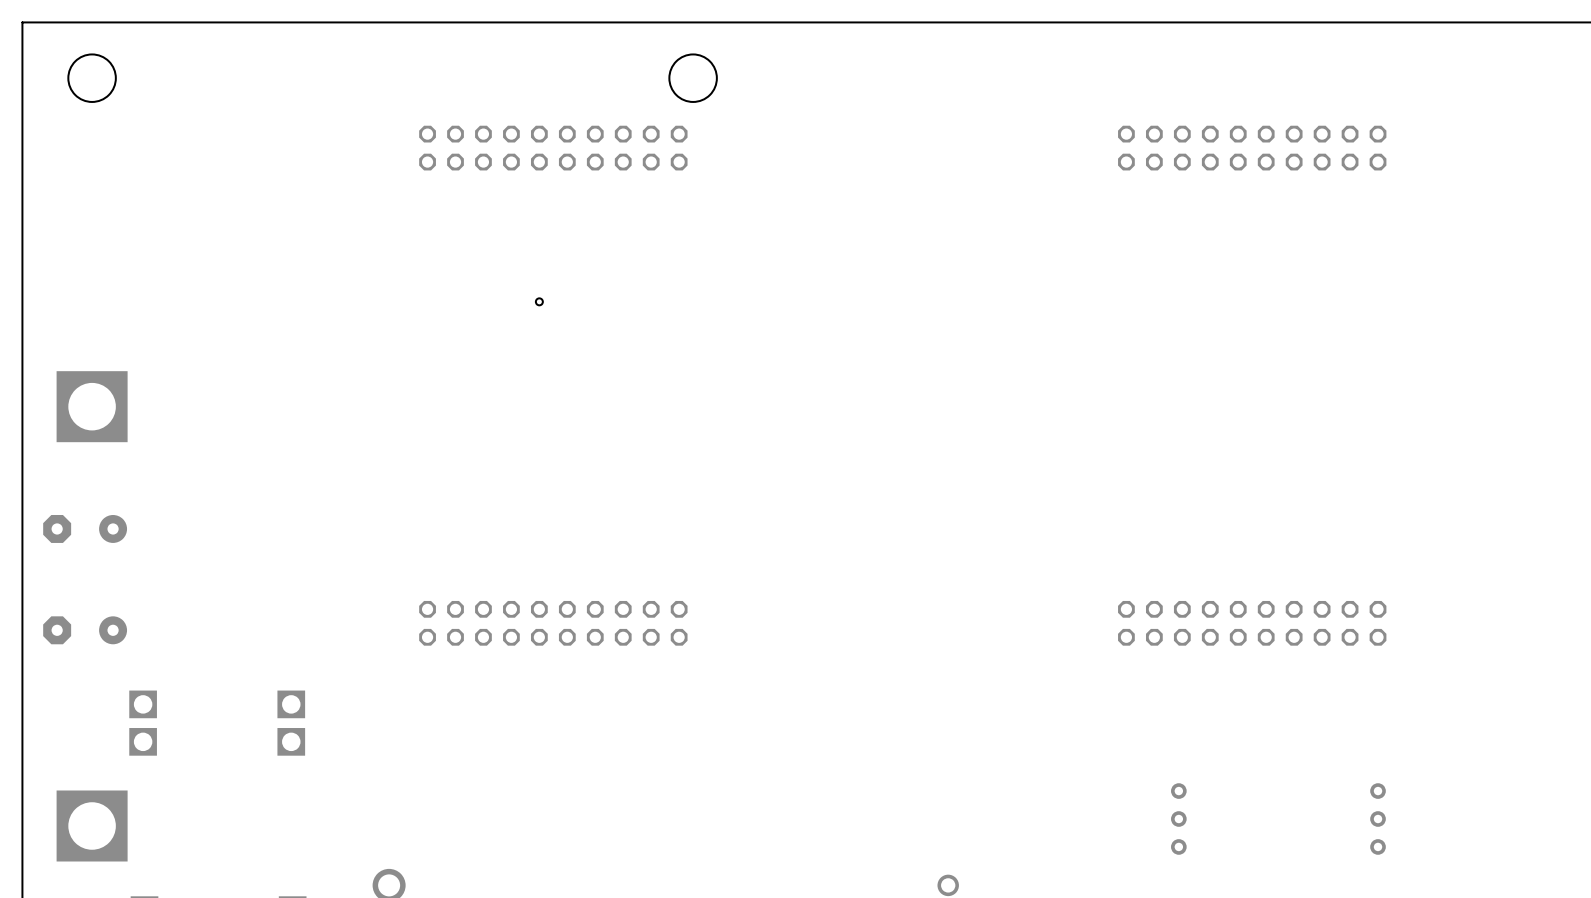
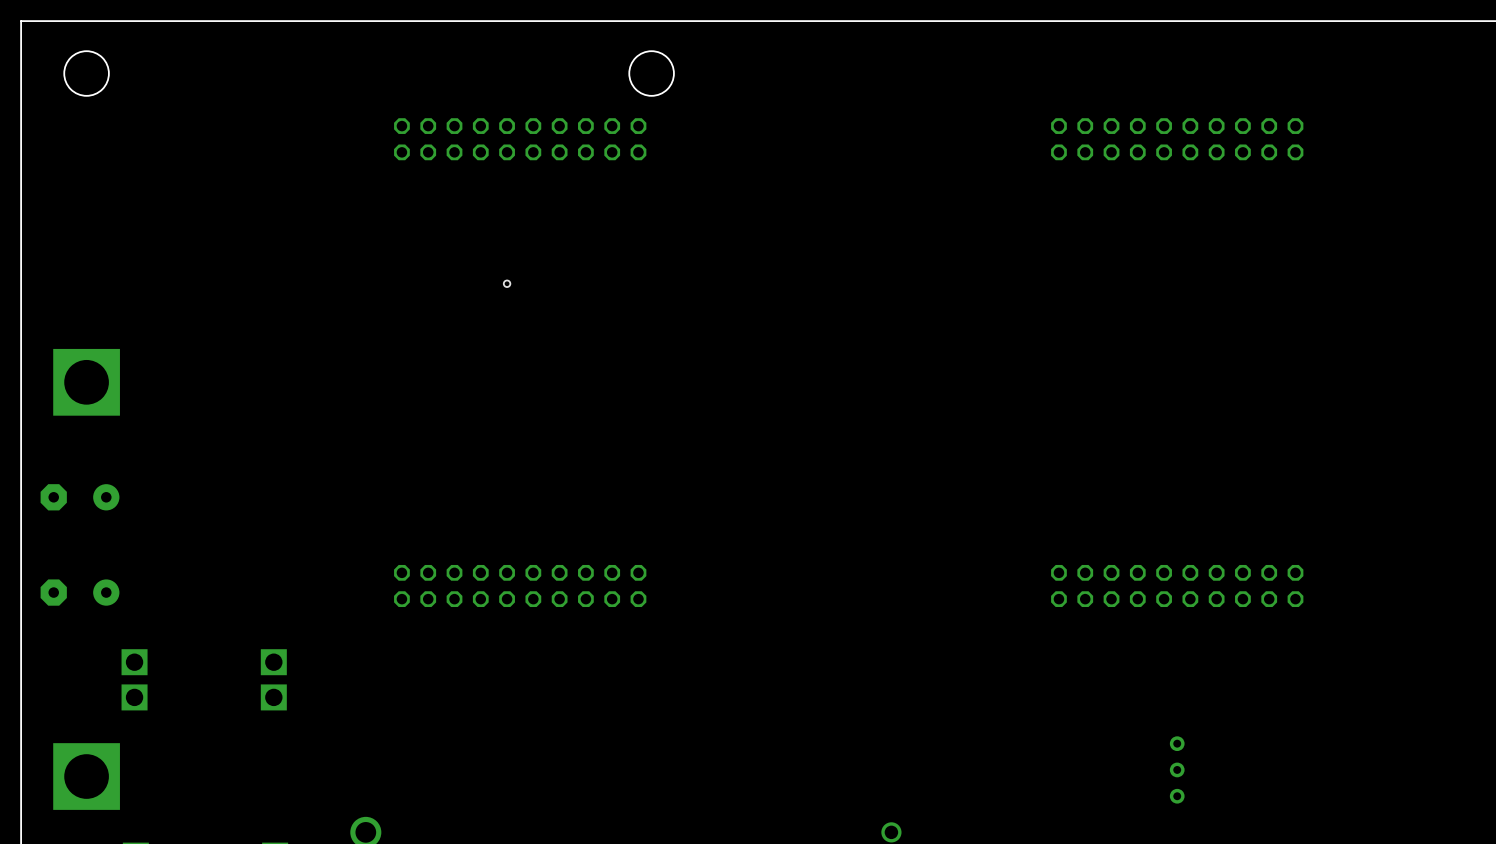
part: (1178, 819) -> none
part: none -> (1177, 769)
part: (1378, 819) -> none

